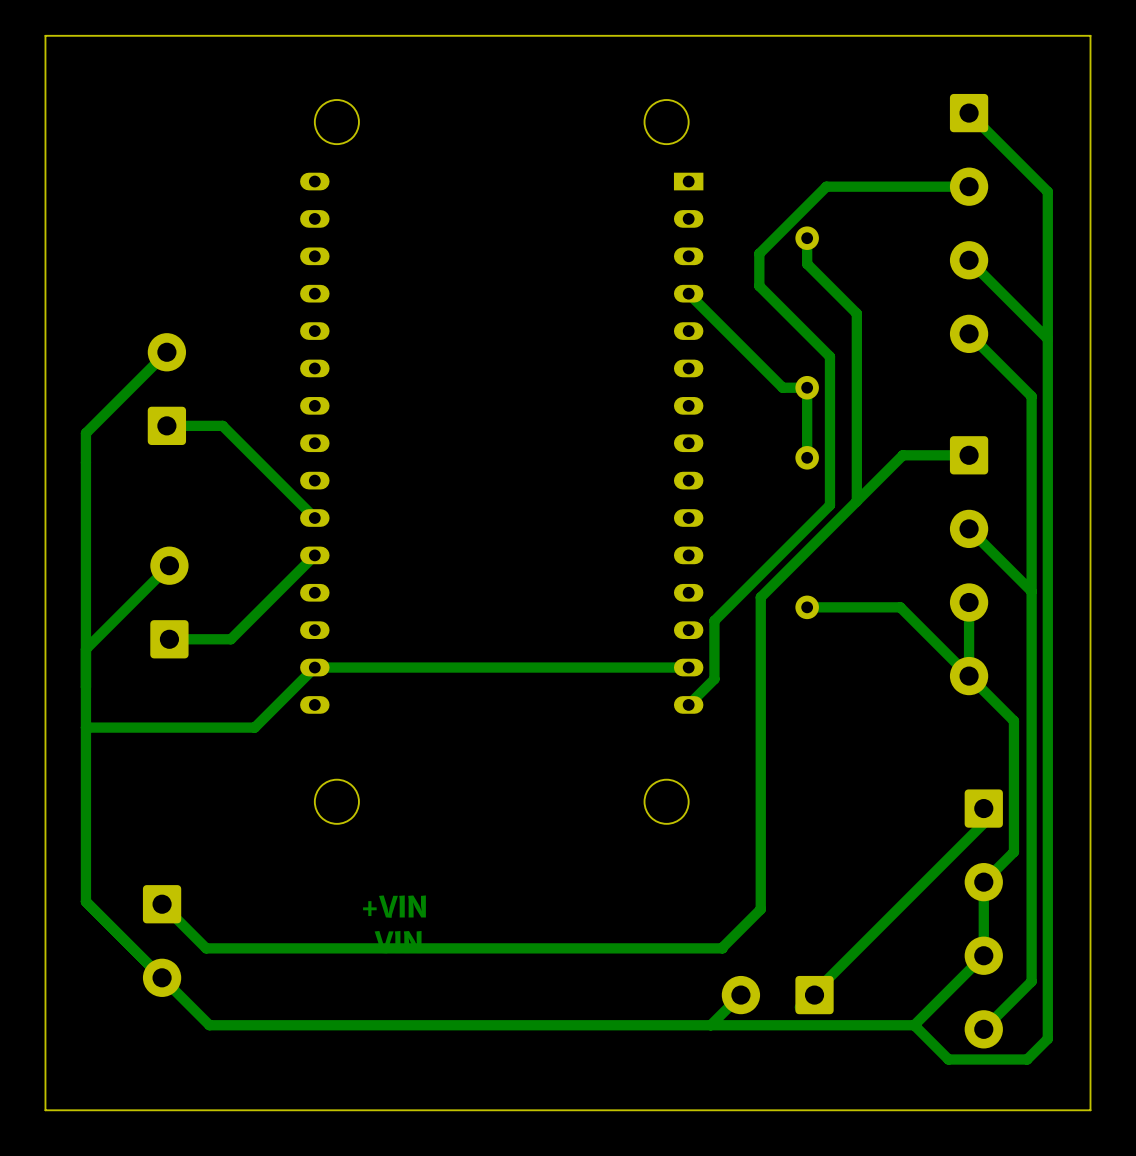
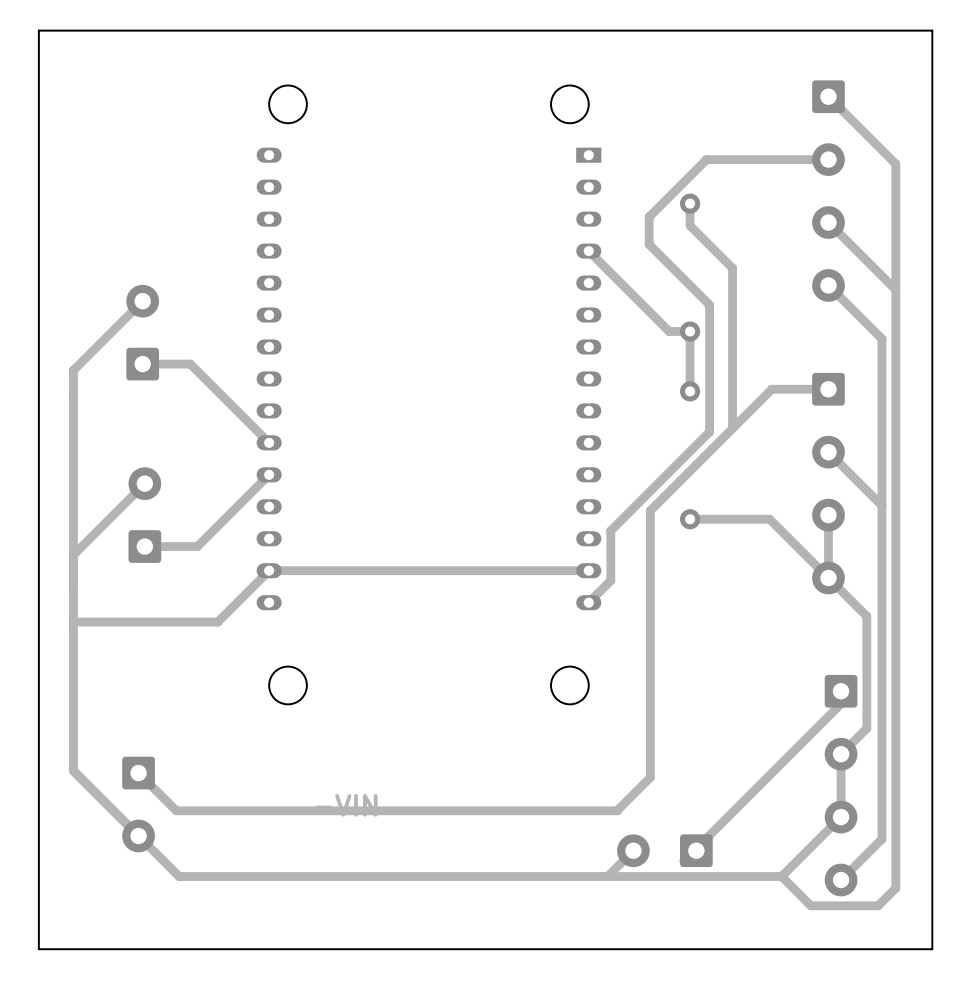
text: +VIN (394, 906) -> none

